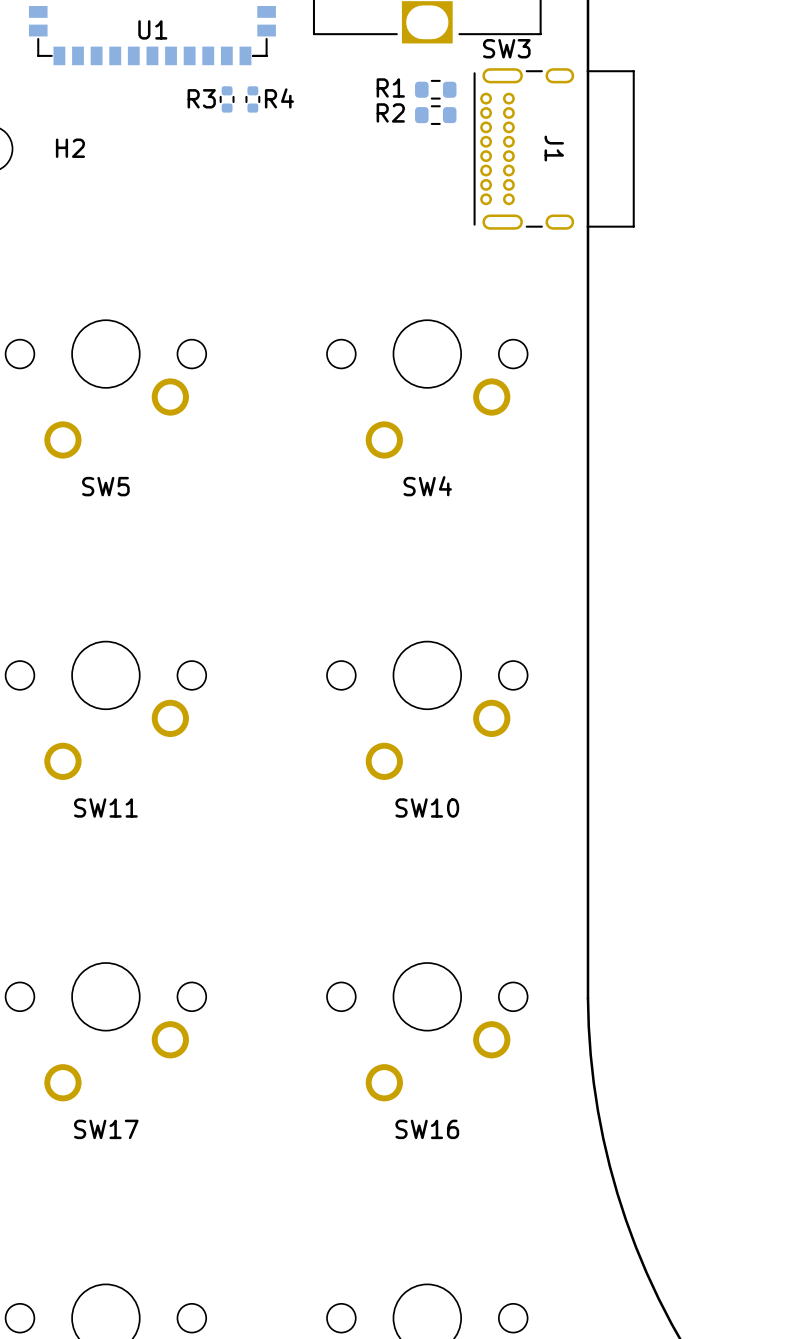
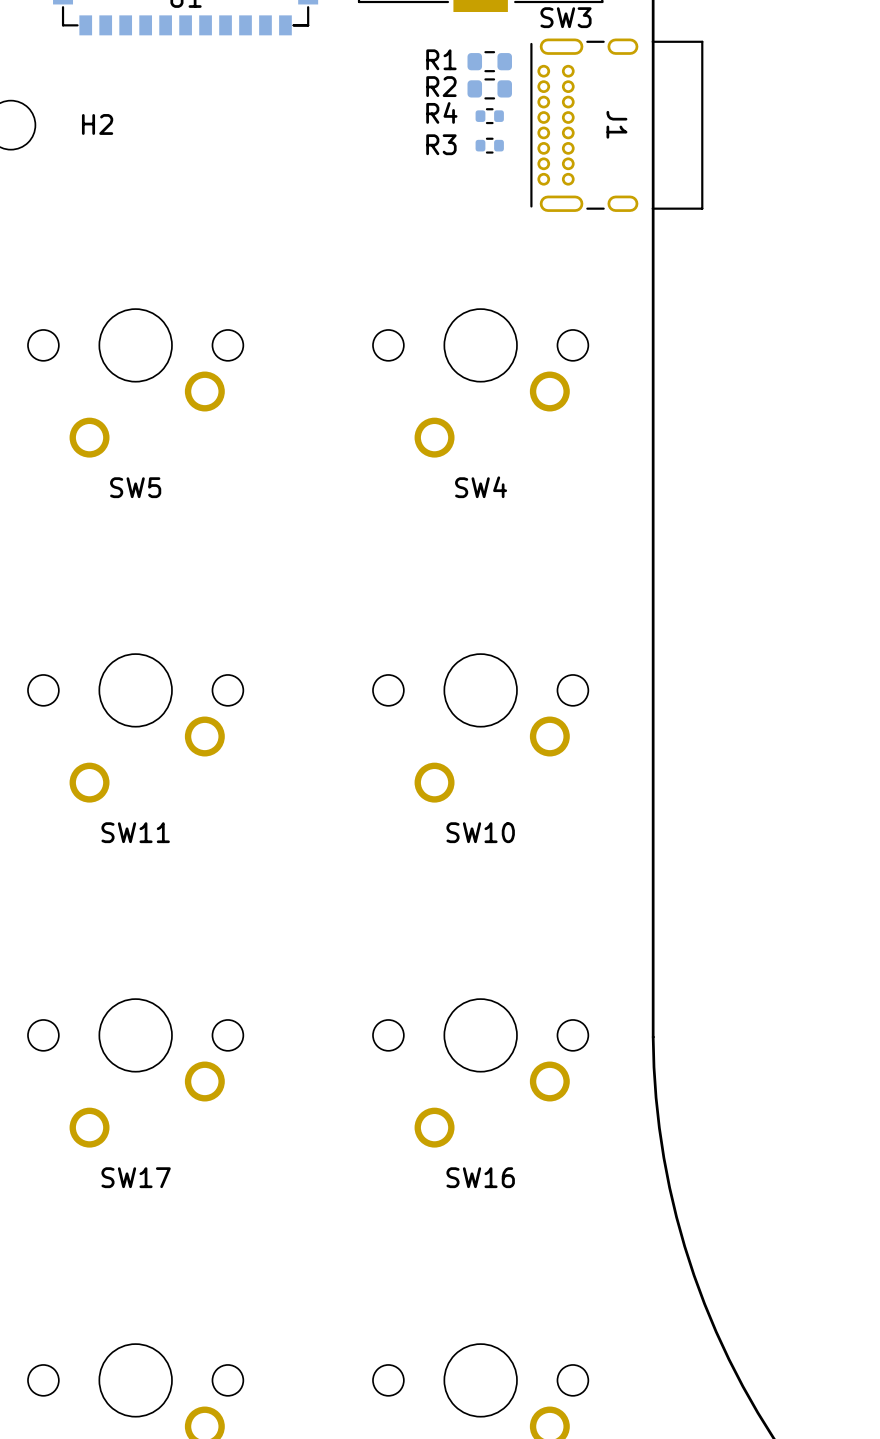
R4 name position: R4 (279, 98) -> R4 (441, 112)
R3 rotation: 0° (227, 99) -> 90° clockwise (489, 145)
R3 position: (227, 99) -> (489, 145)
R4 rotation: 0° (252, 99) -> 90° clockwise (489, 116)
R4 position: (252, 99) -> (489, 116)

